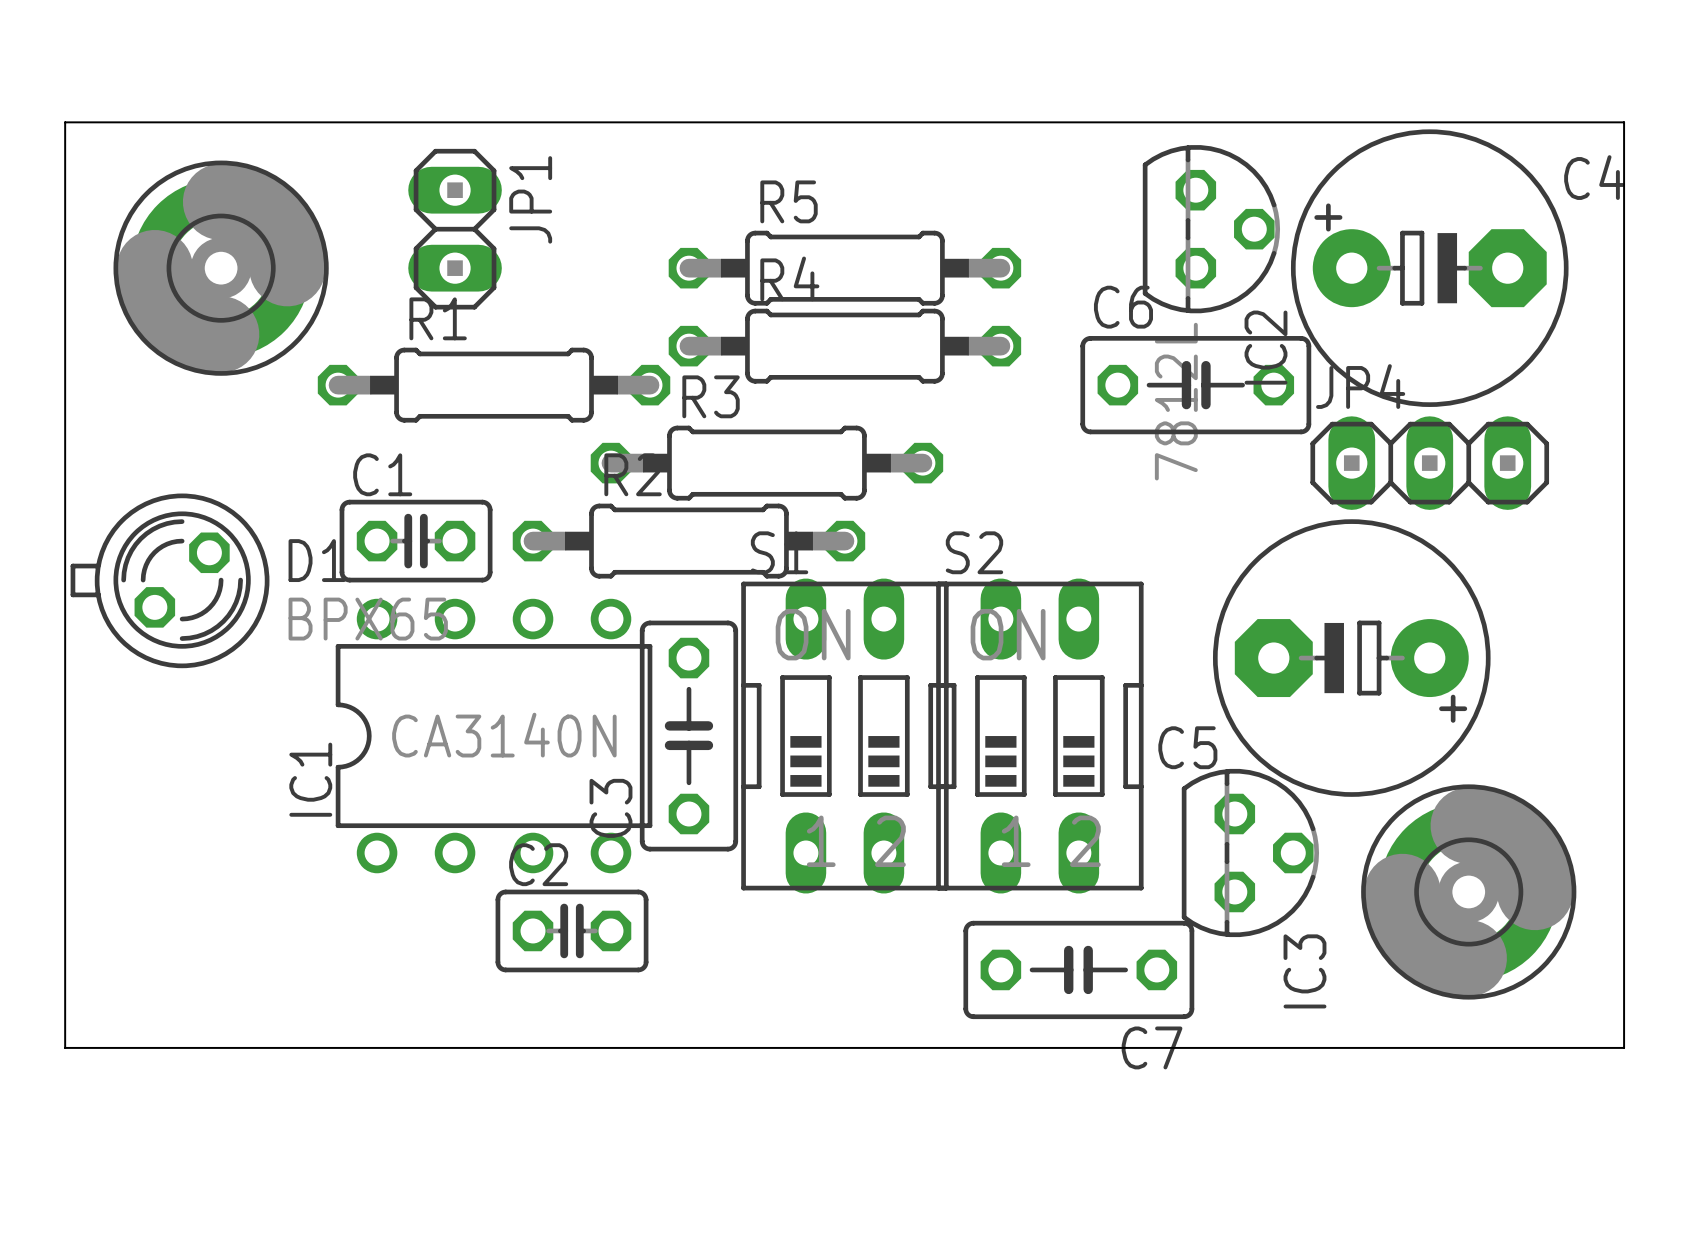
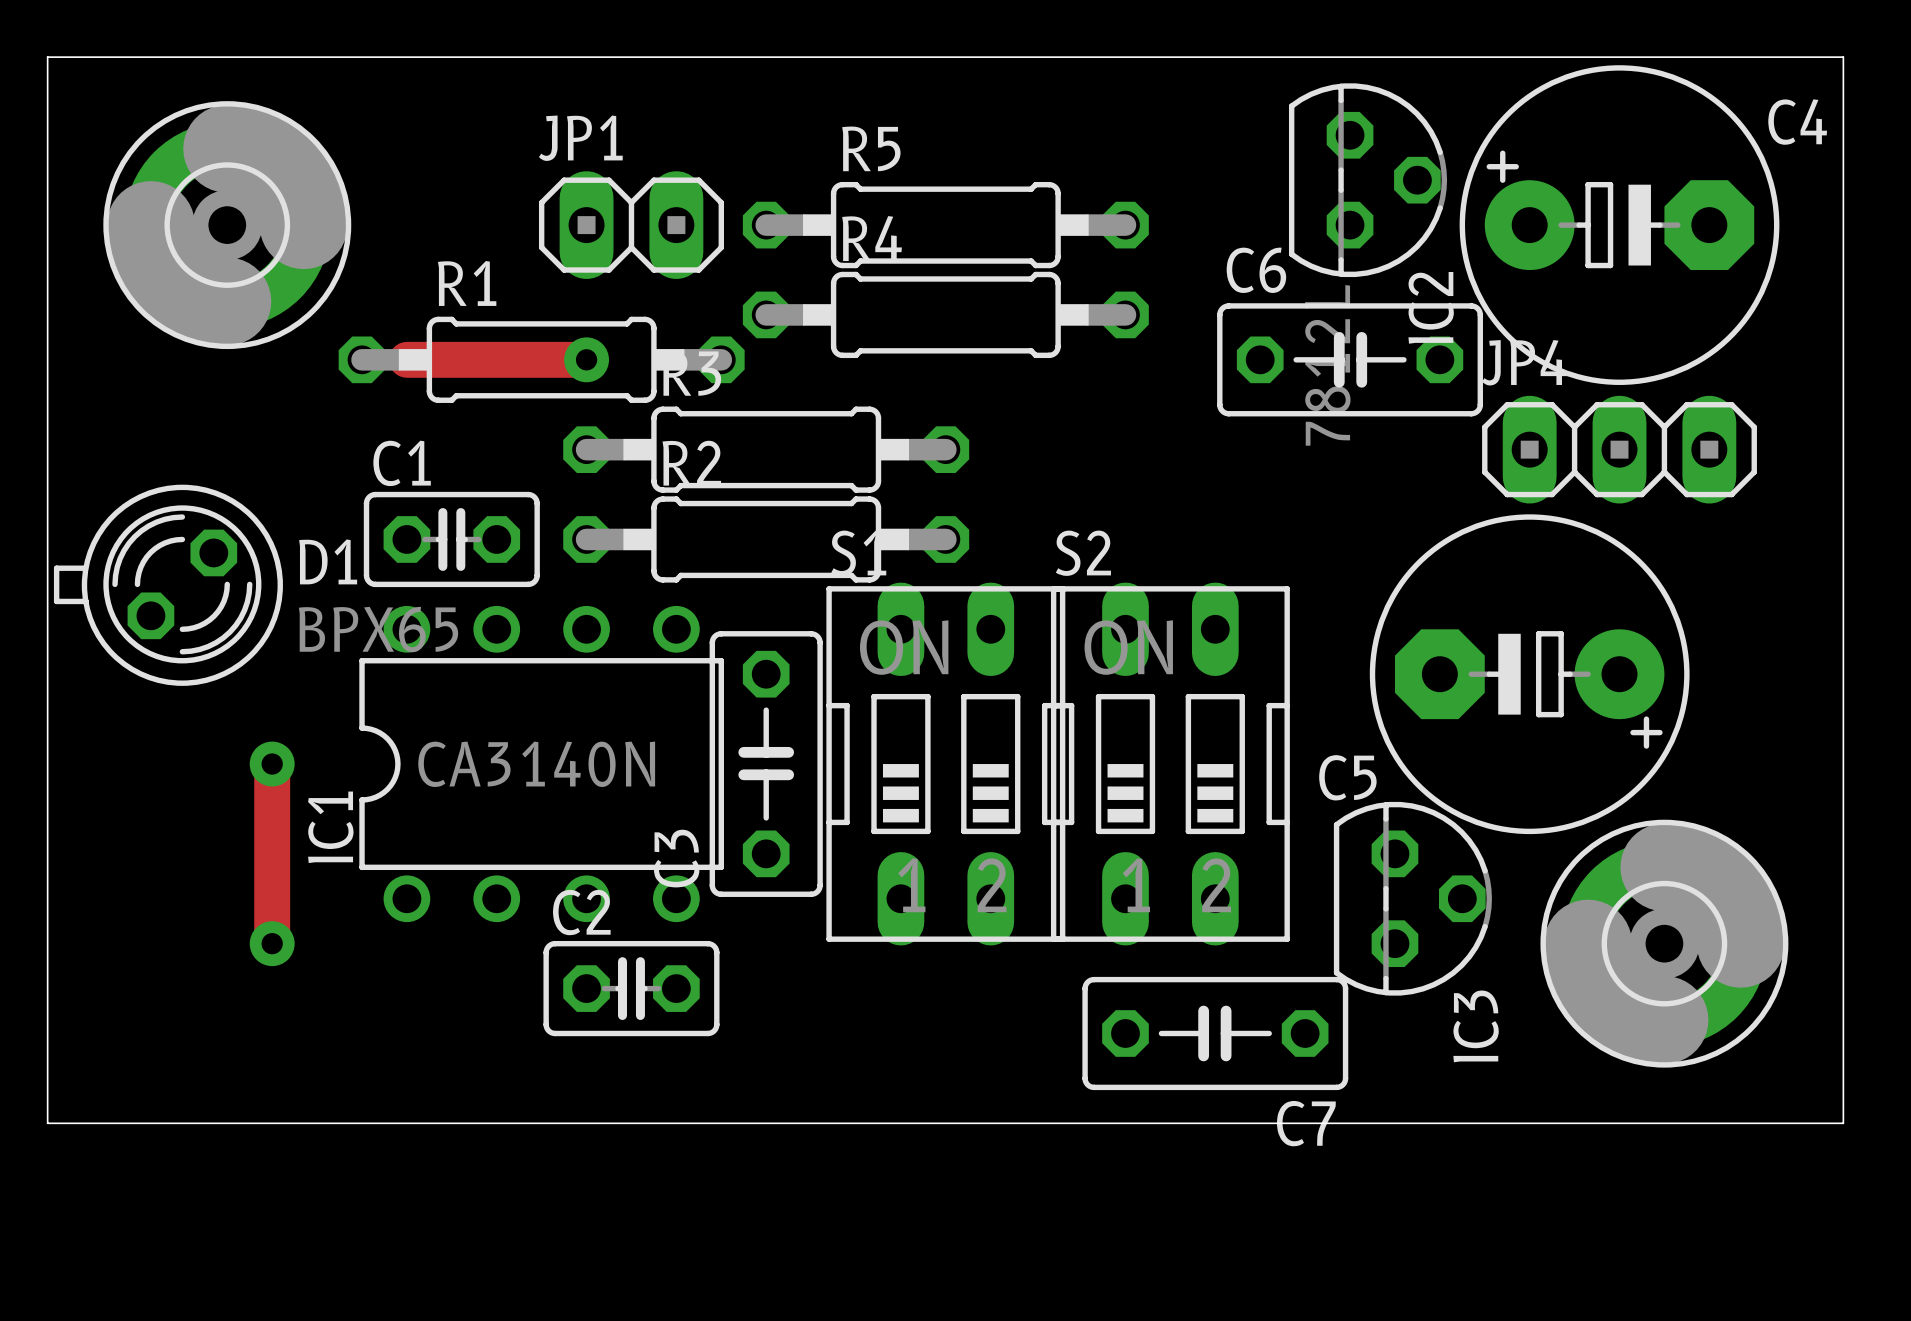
JP1 name position: JP1 (530, 199) -> JP1 (580, 138)
JP1 rotation: 0° (455, 229) -> 90° clockwise (631, 225)
JP1 position: (455, 229) -> (631, 225)
track: none -> (406, 359) (586, 359)
via: none -> (586, 359)
R3 position: (766, 463) -> (766, 449)
track: none -> (272, 764) (272, 943)
via: none -> (272, 764)
via: none -> (272, 943)

